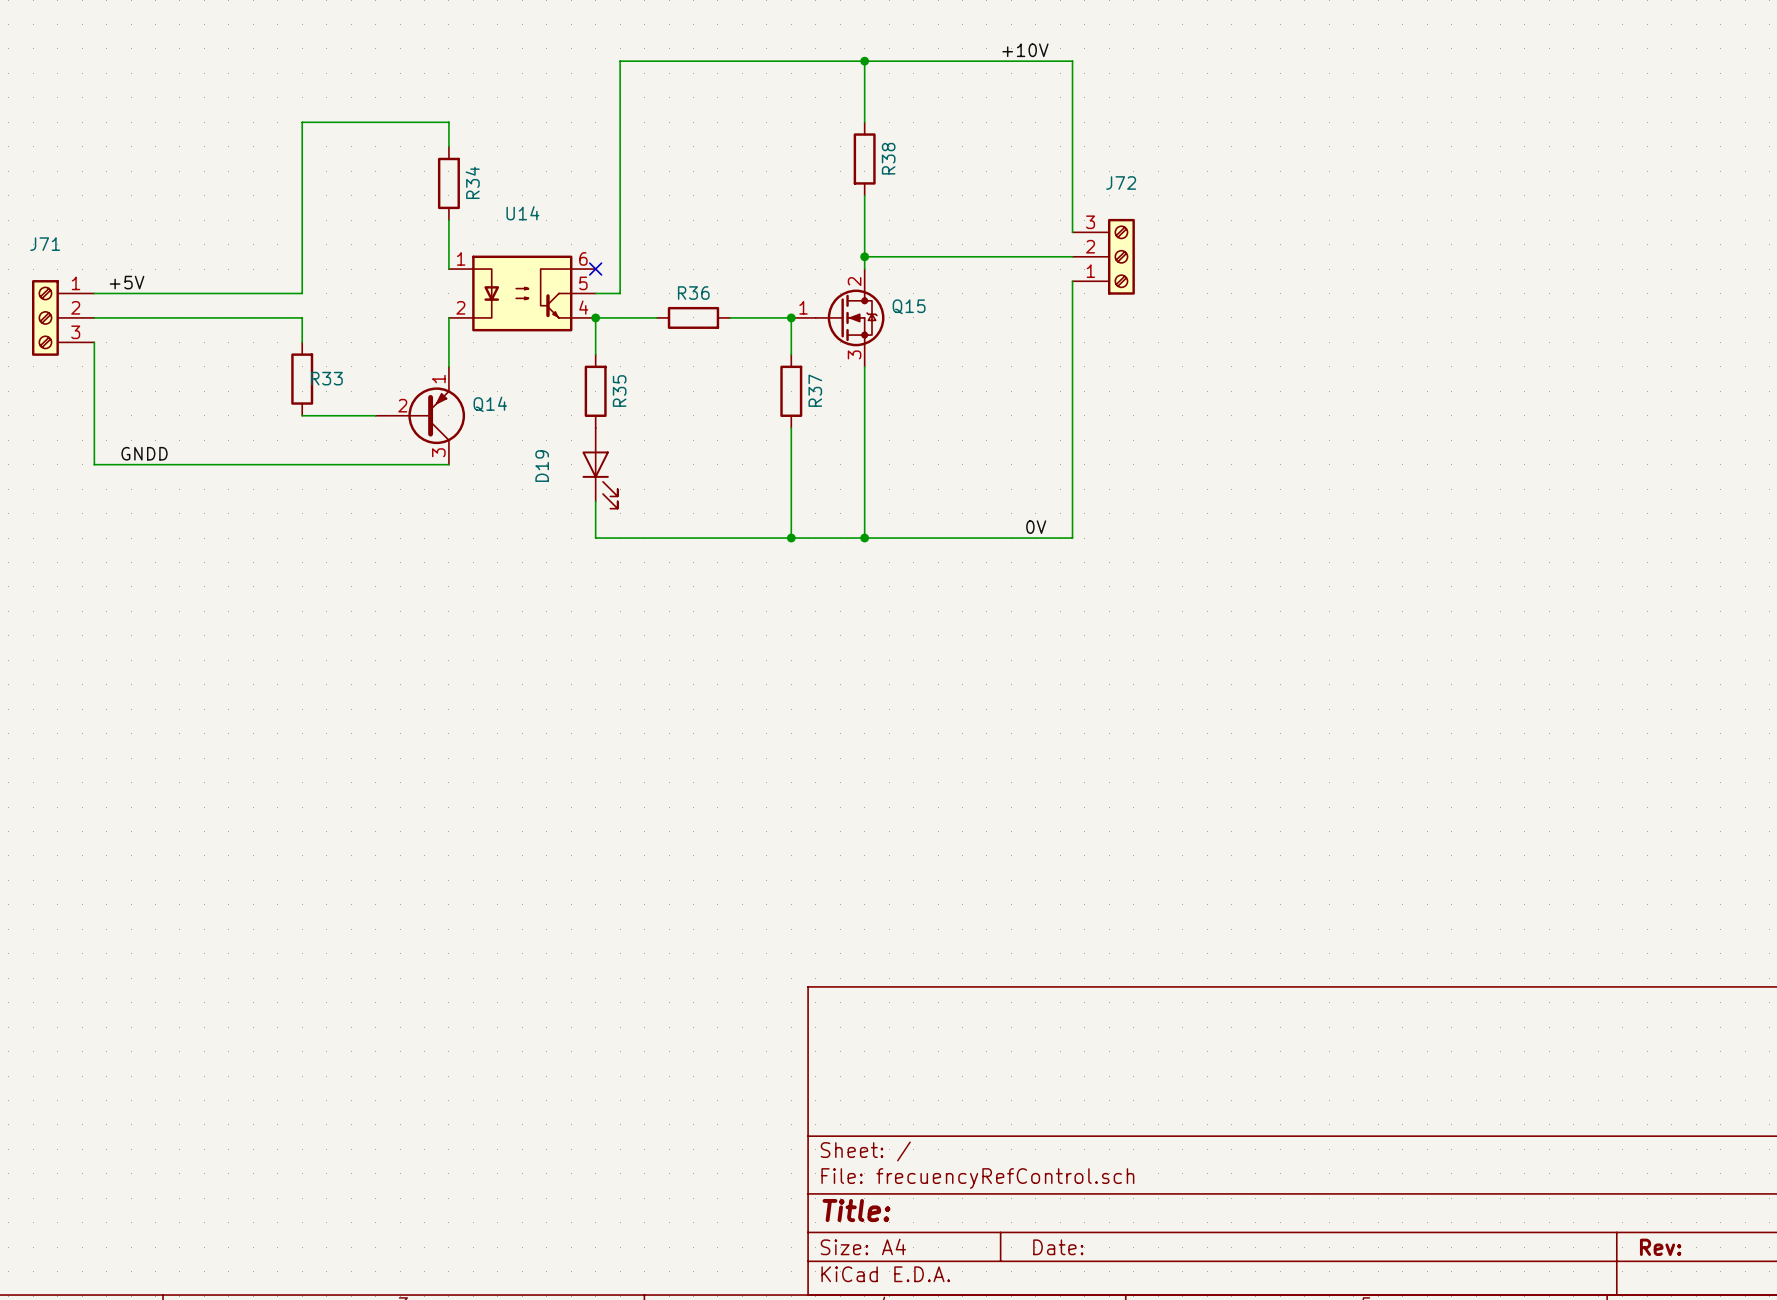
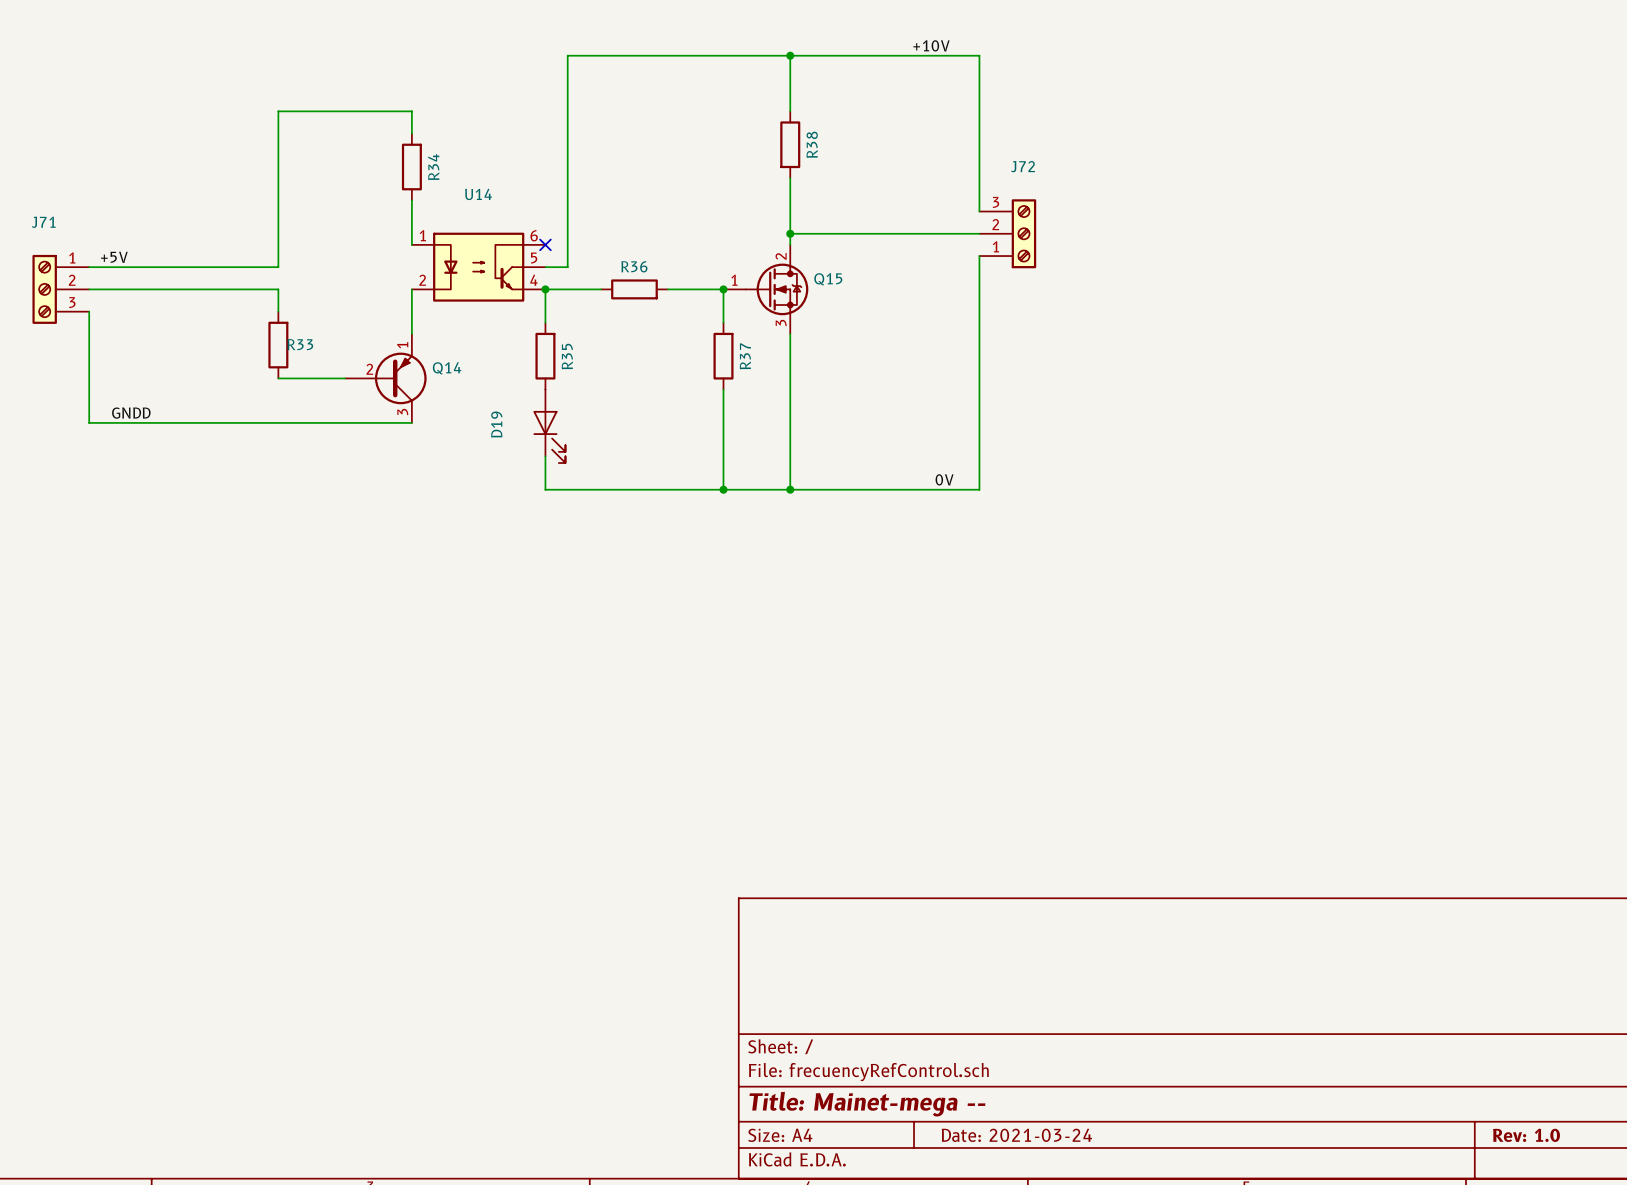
title block: Title: (856, 1210) -> Title: Mainet-mega -- (867, 1104)
title block: Date: (1058, 1247) -> Date: 2021-03-24 (1016, 1135)
title block: Rev: (1660, 1247) -> Rev: 1.0 (1526, 1135)

